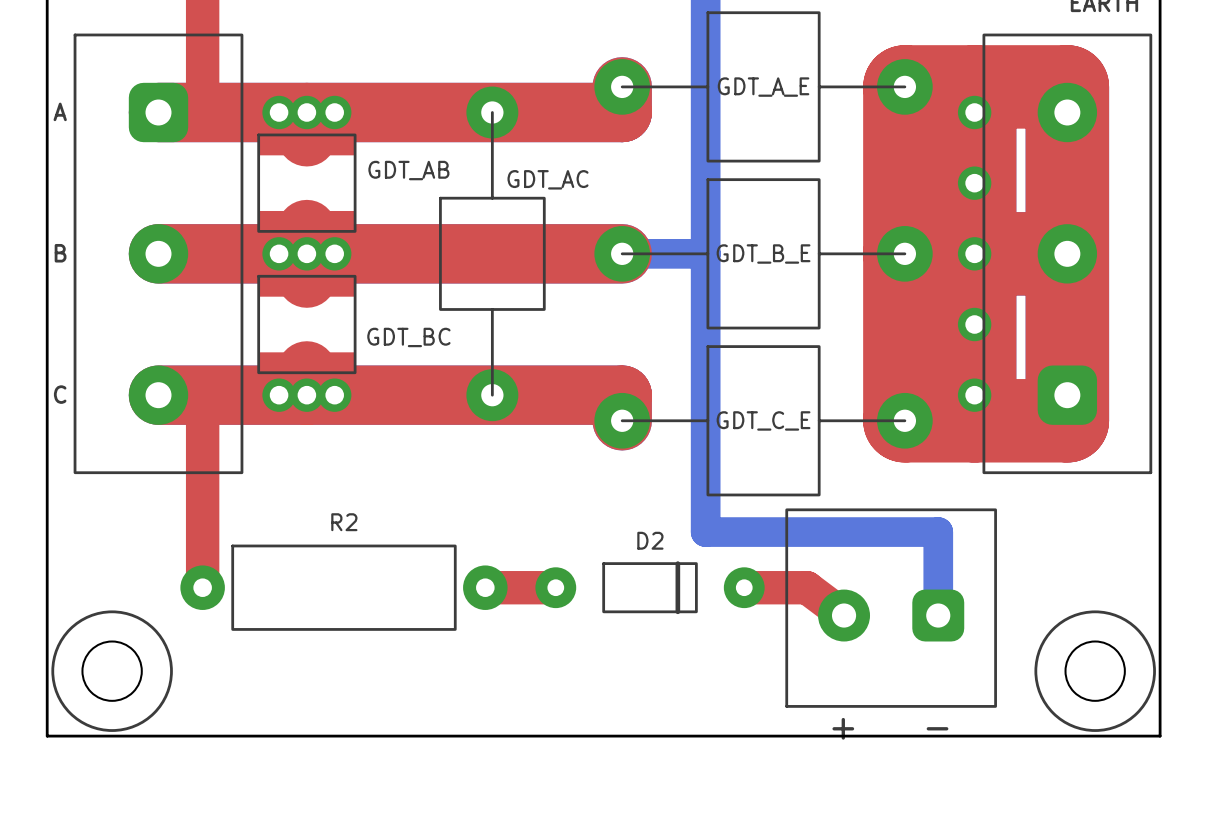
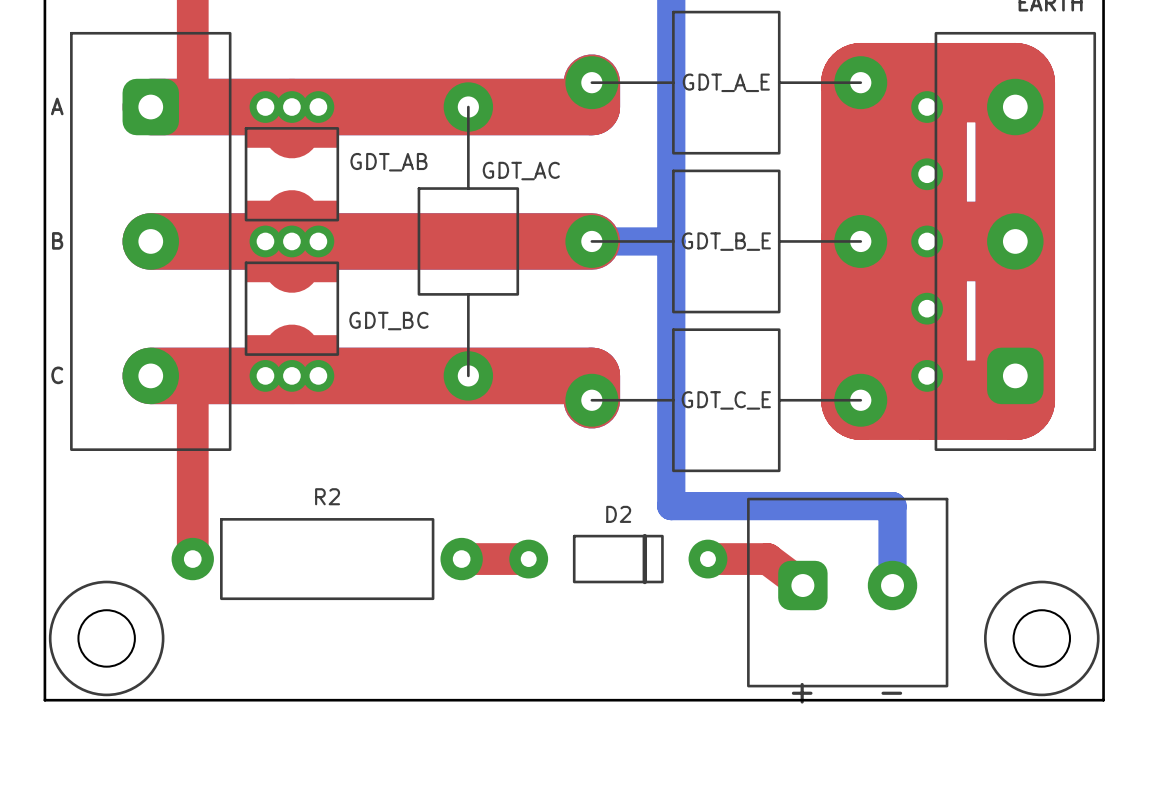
part rotation: 0° (891, 608) -> 180° (847, 592)

